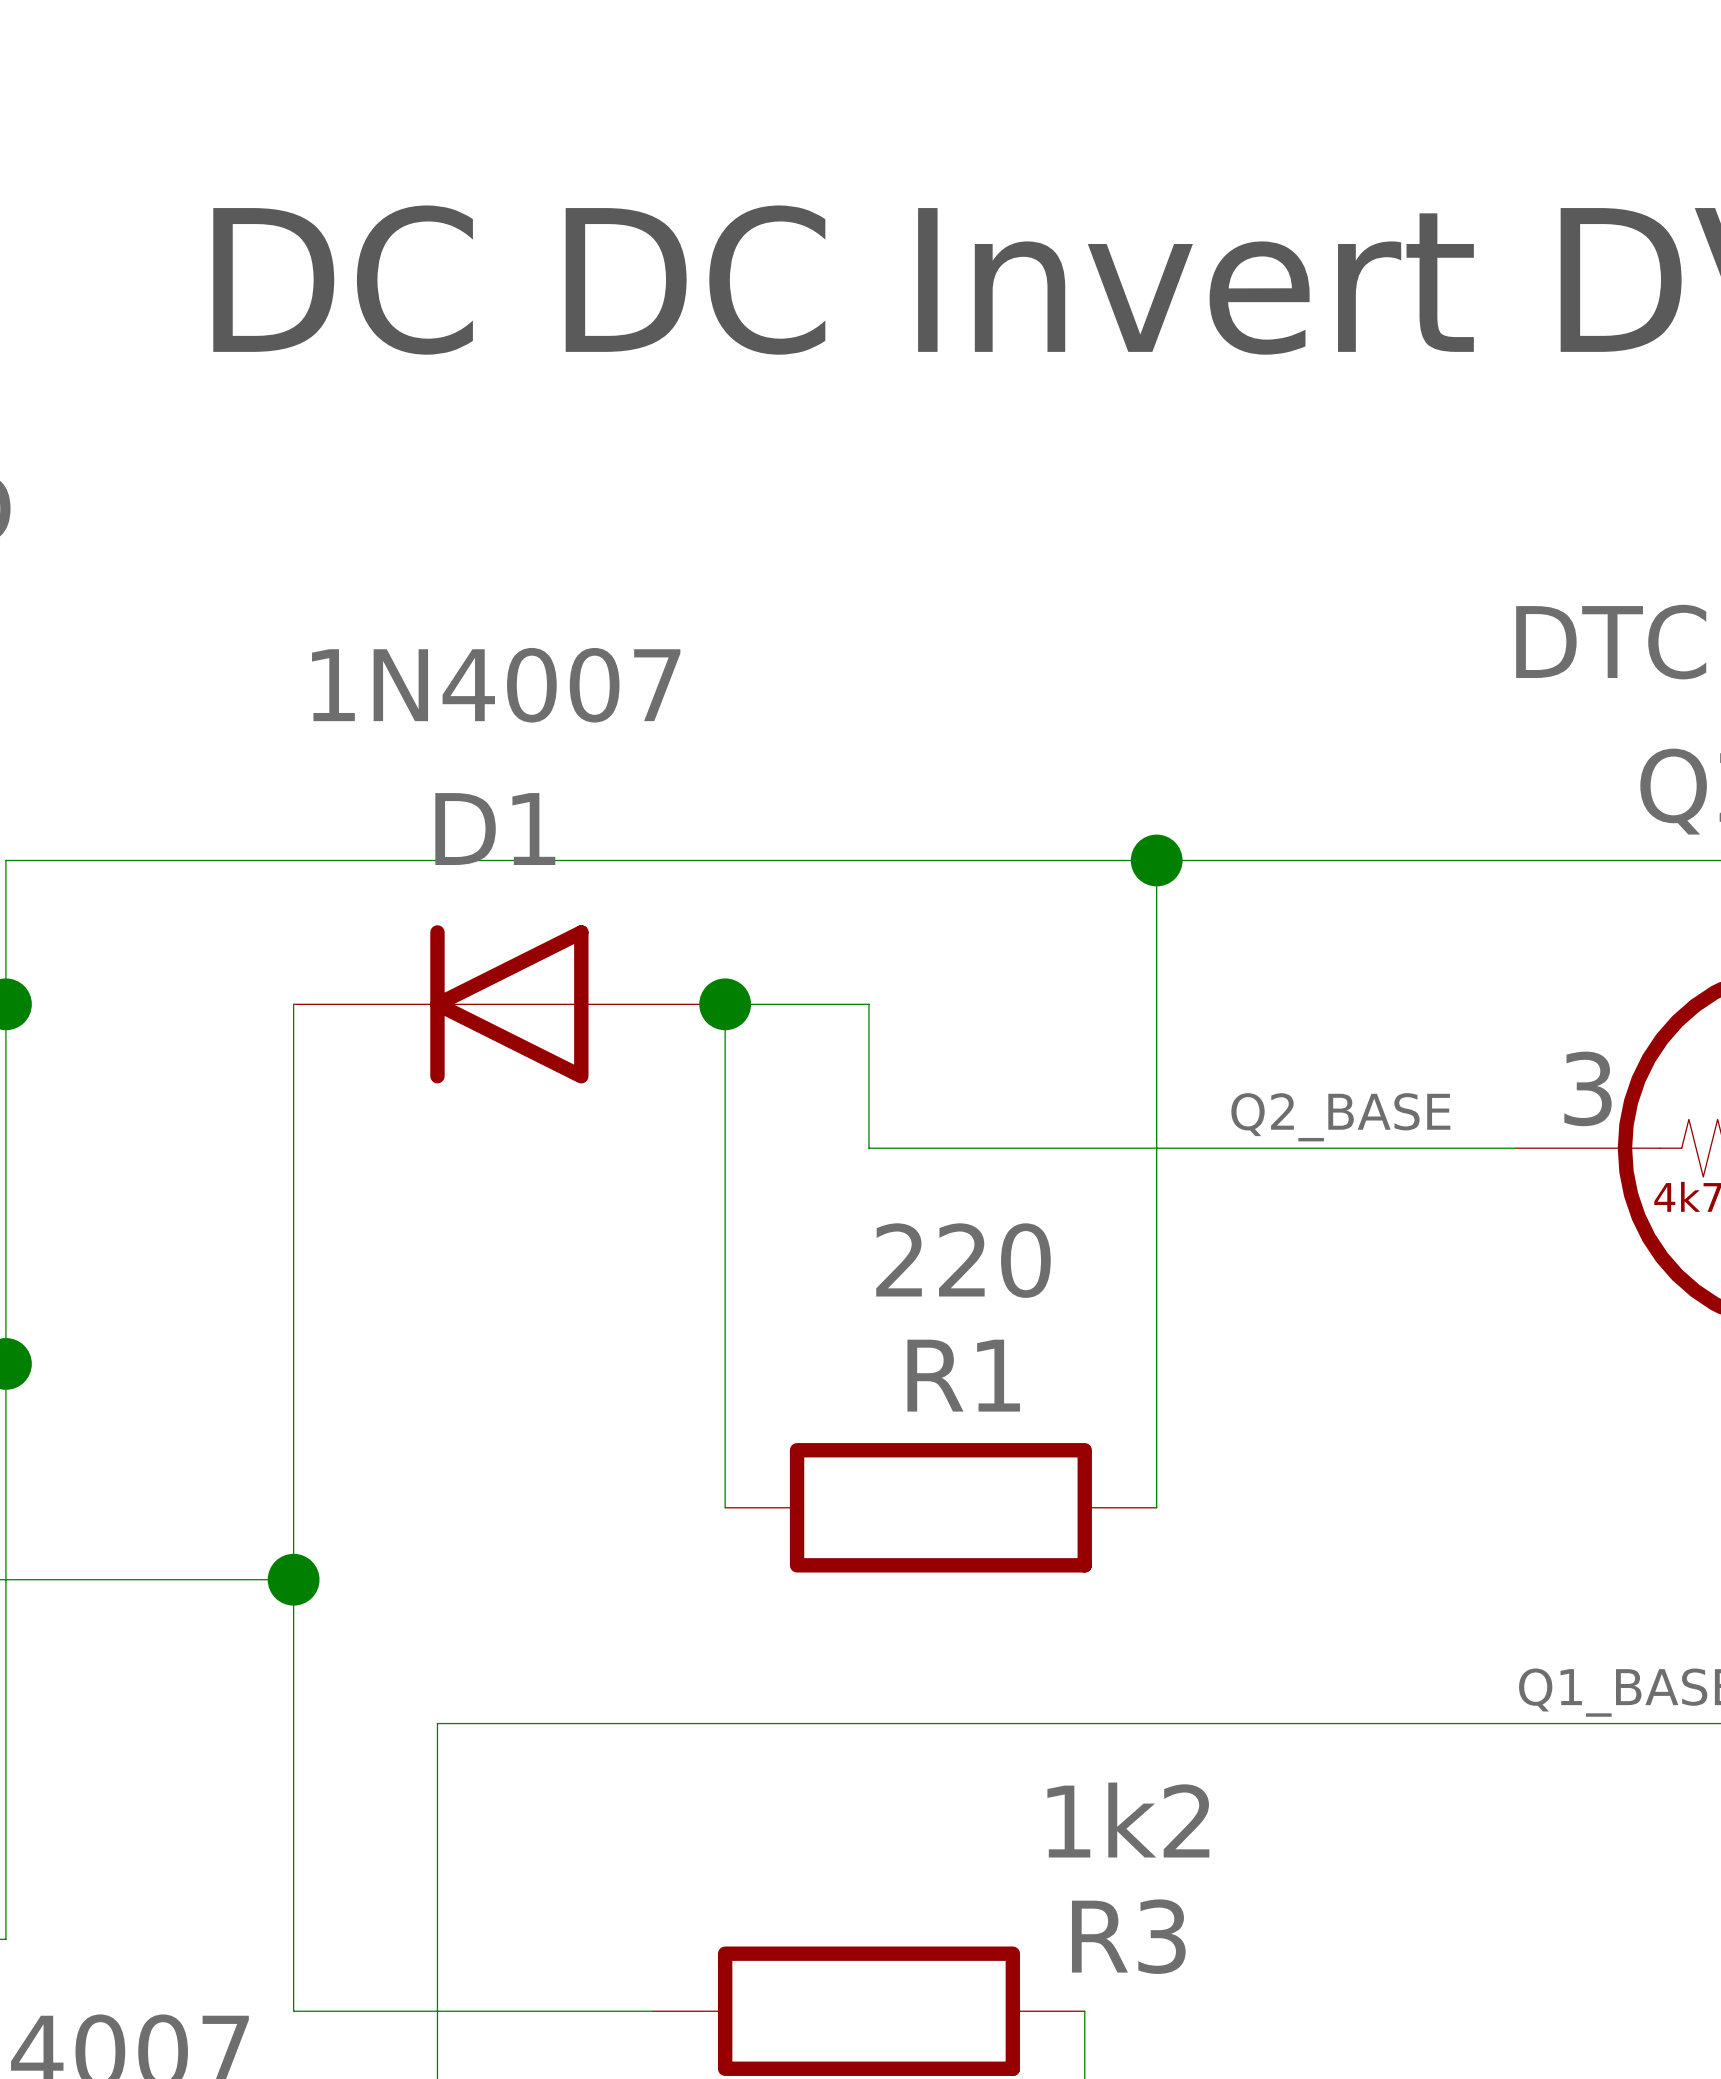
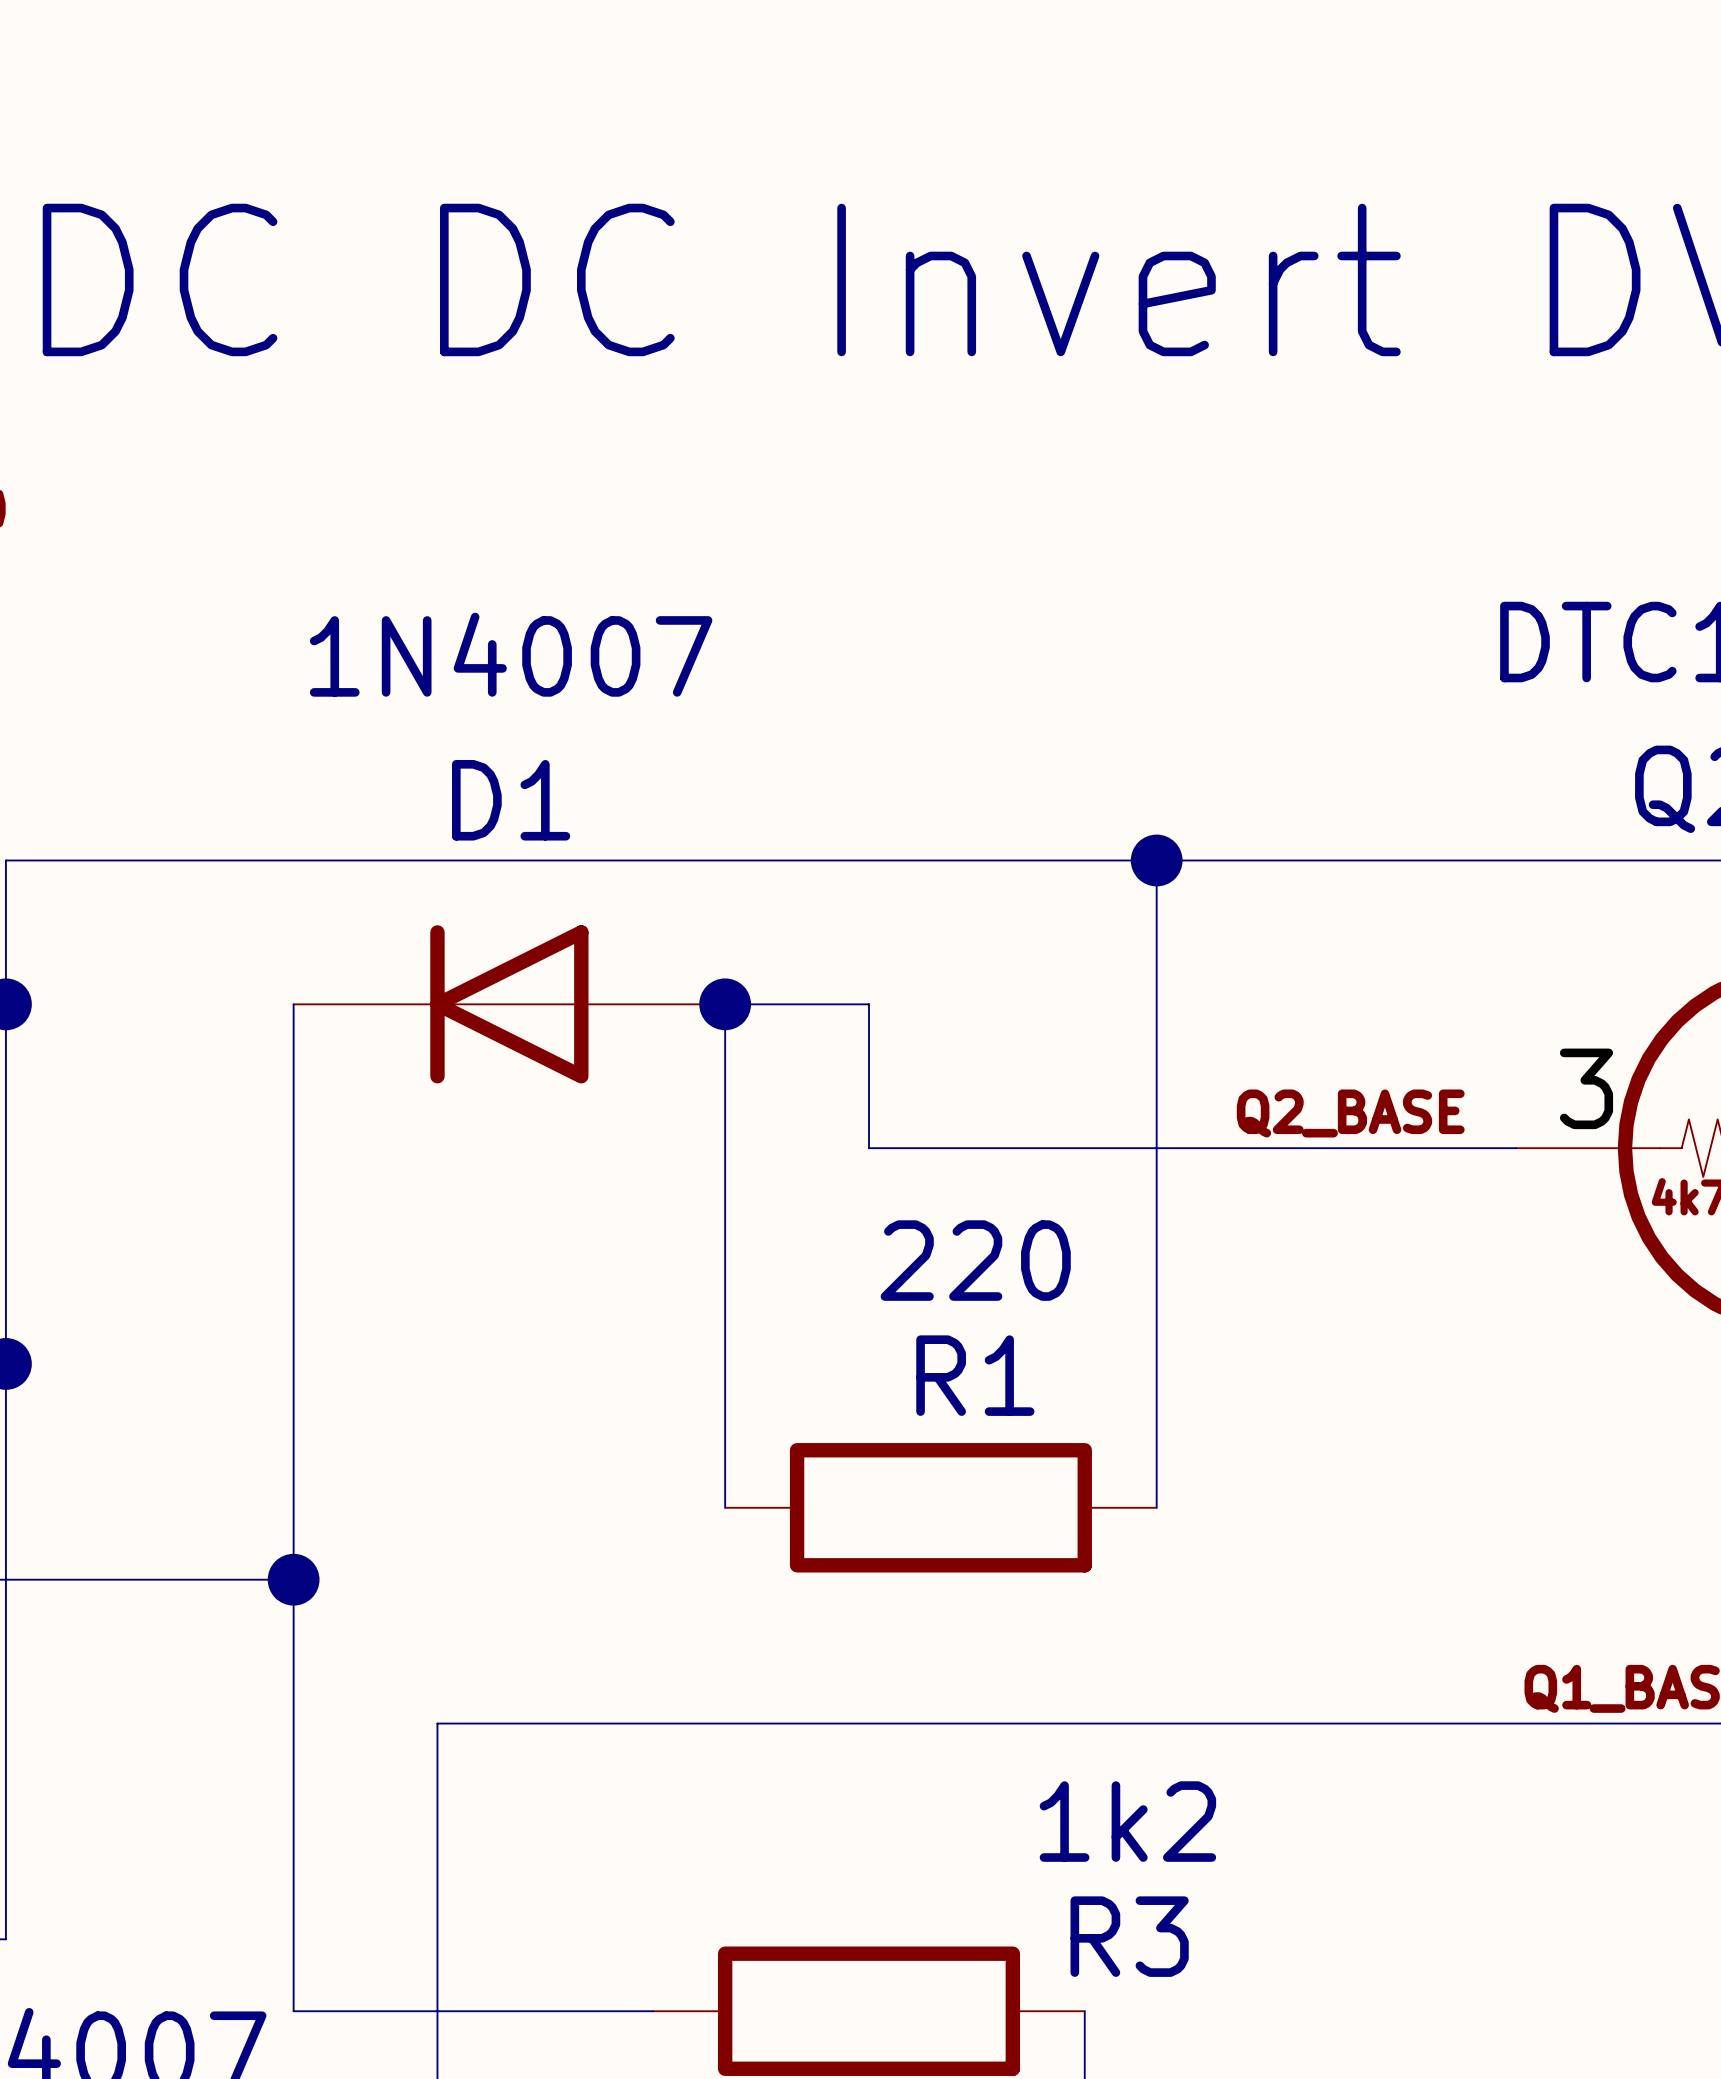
D1 value position: 1N4007 (496, 685) -> 1N4007 (511, 654)
D1 name position: D1 (495, 829) -> D1 (511, 800)

